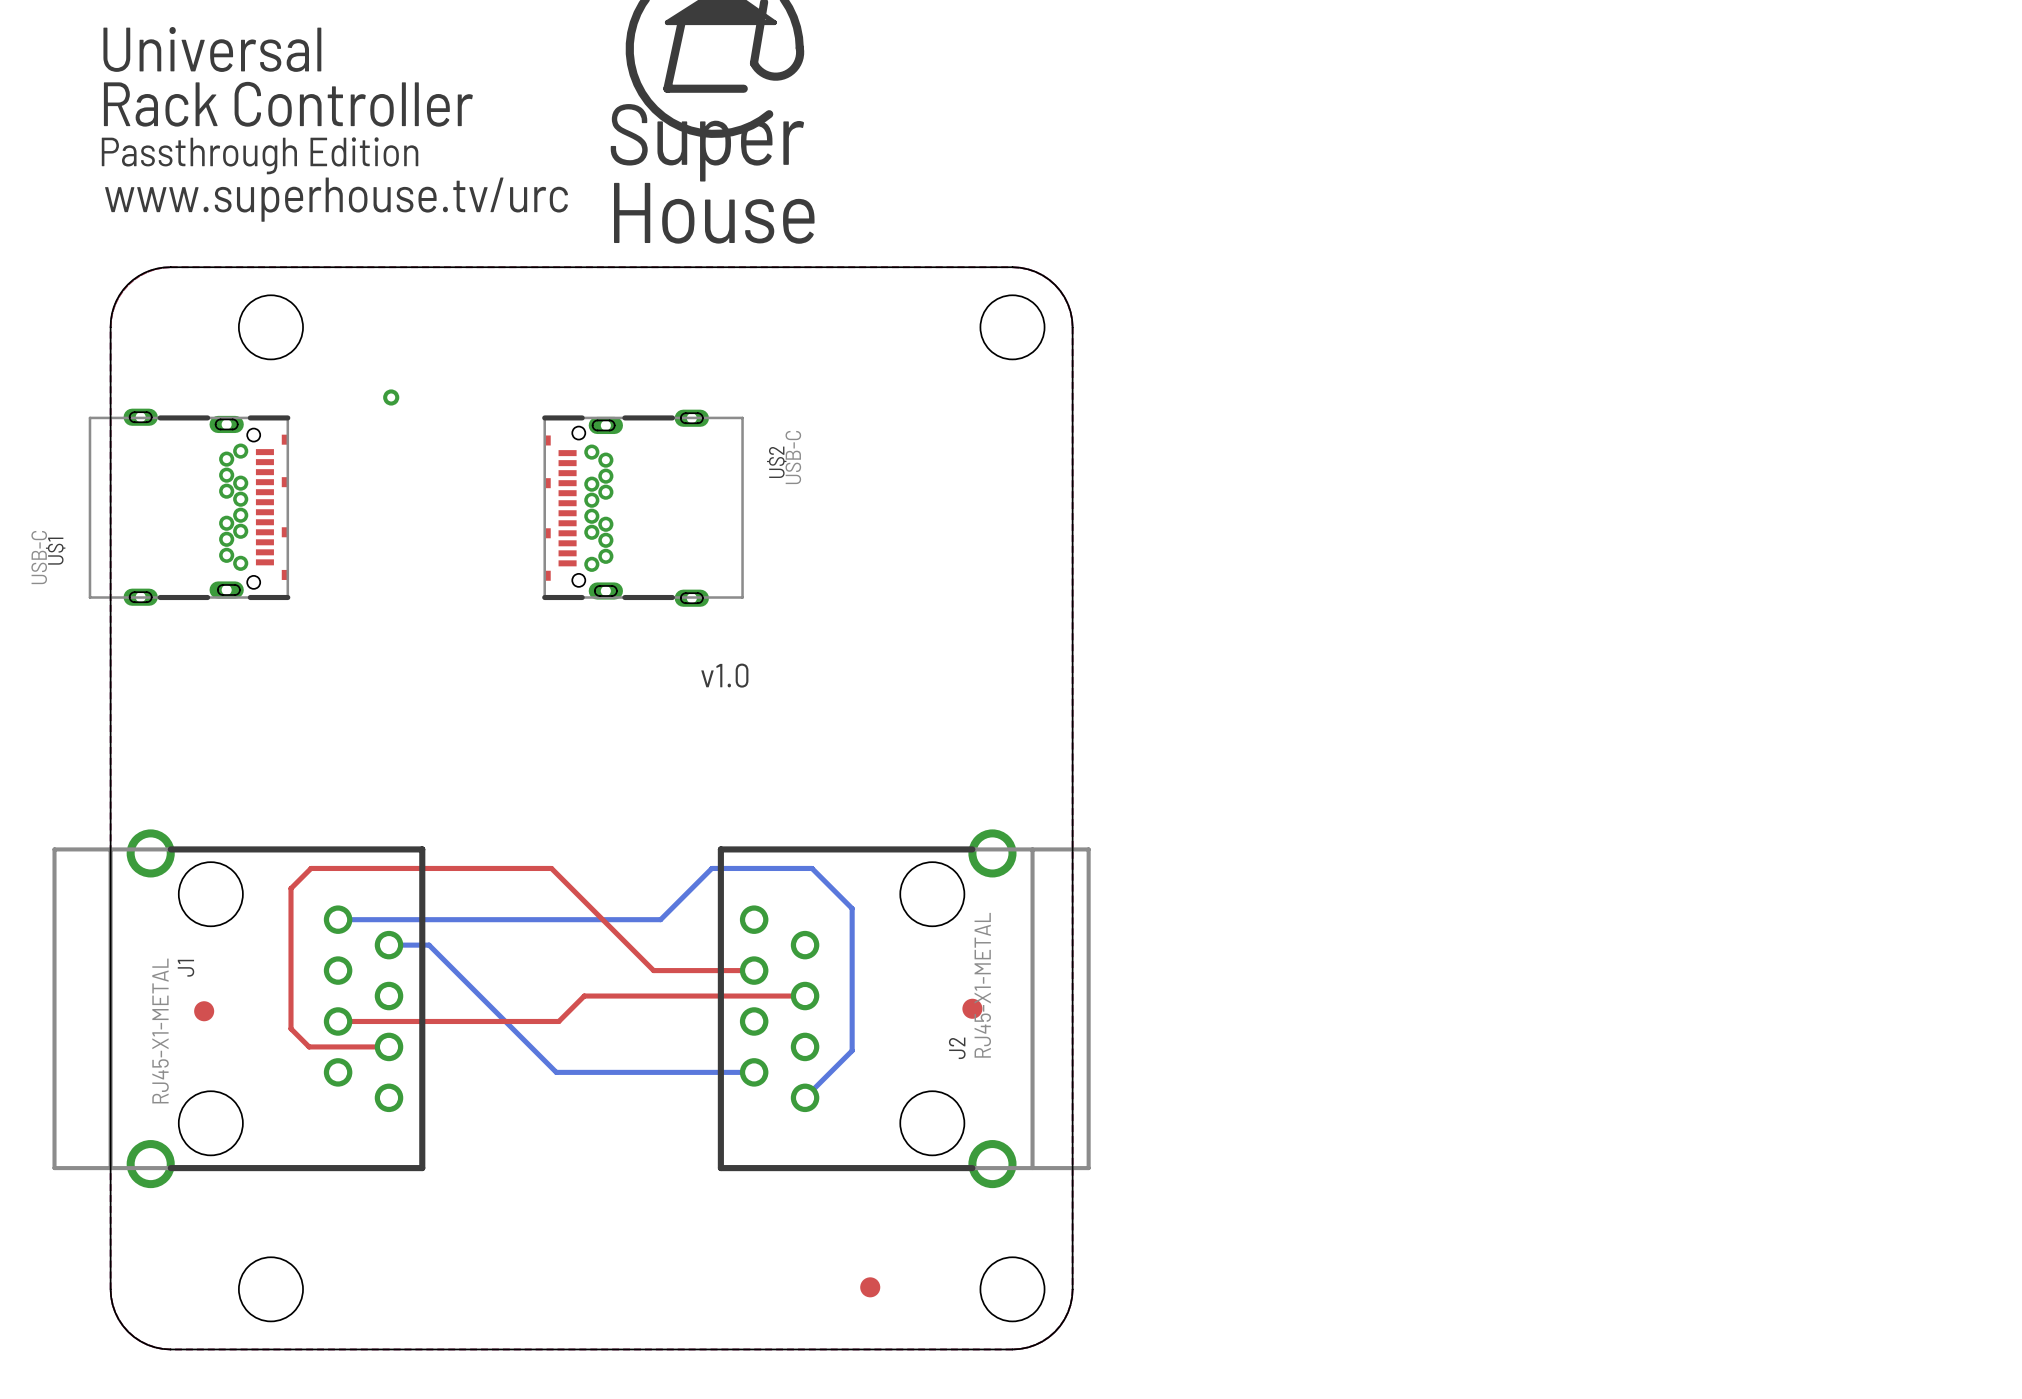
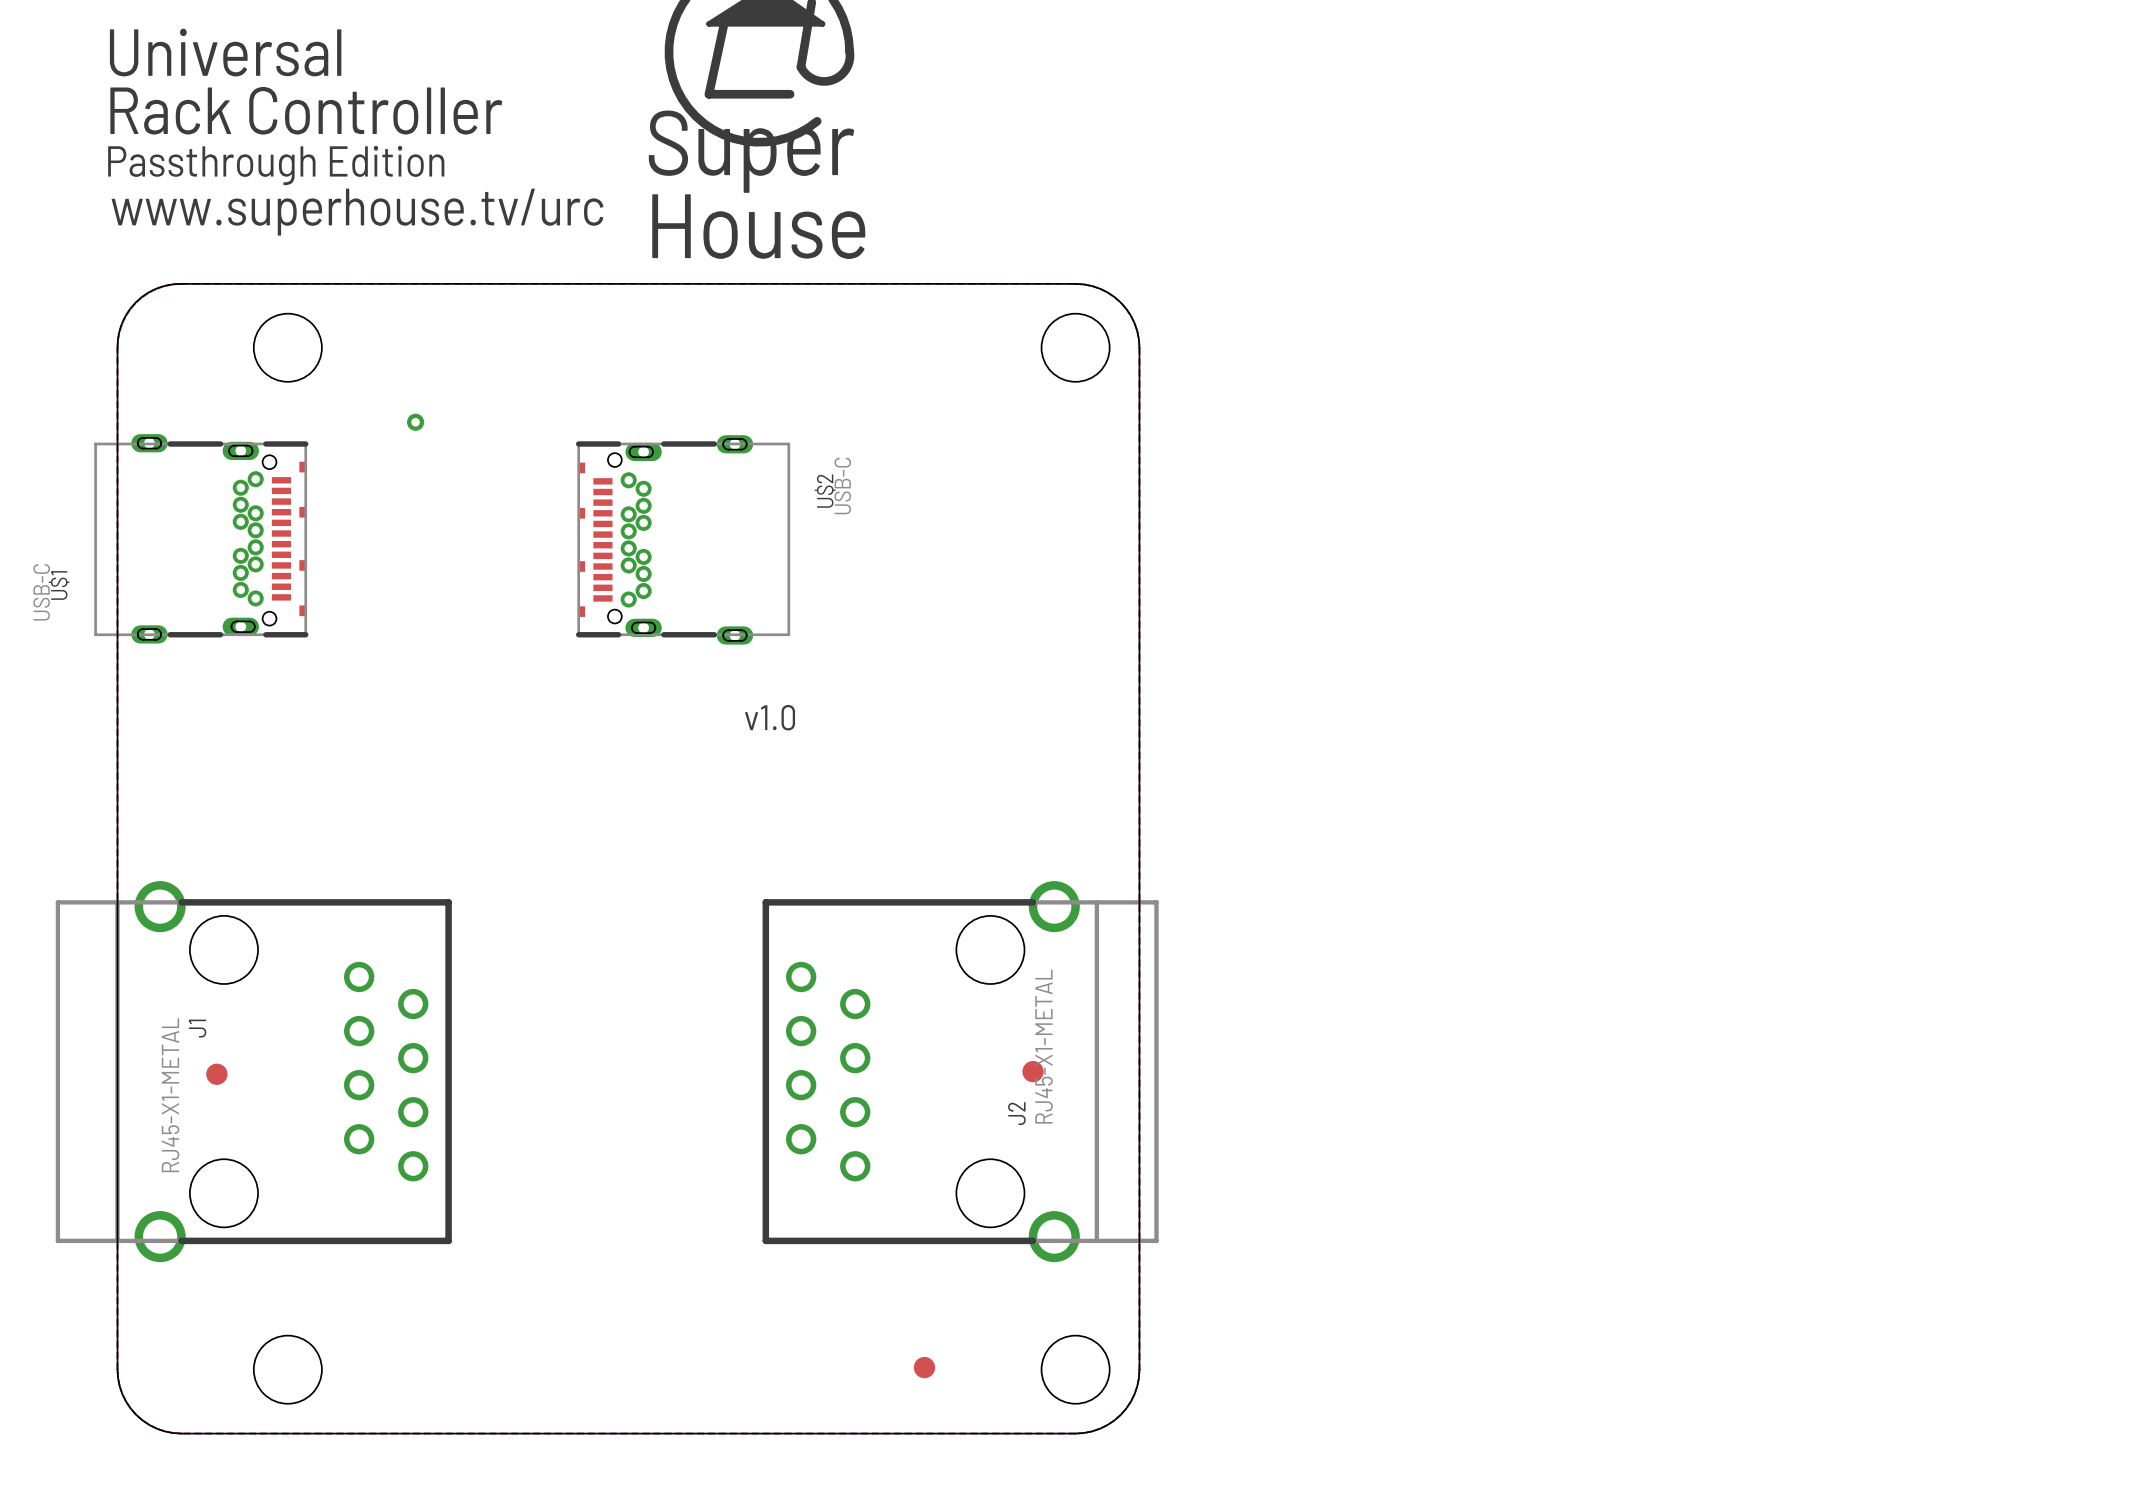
bottom track: (338, 919) (660, 919) (711, 868) (812, 868) (852, 908) (852, 1050) (805, 1097) -> none
bottom track: (389, 945) (429, 945) (556, 1072) (754, 1072) -> none
top track: (754, 970) (653, 970) (551, 868) (311, 868) (291, 888) (291, 1028) (309, 1046) (389, 1046) -> none
top track: (805, 996) (584, 996) (558, 1021) (338, 1021) -> none

